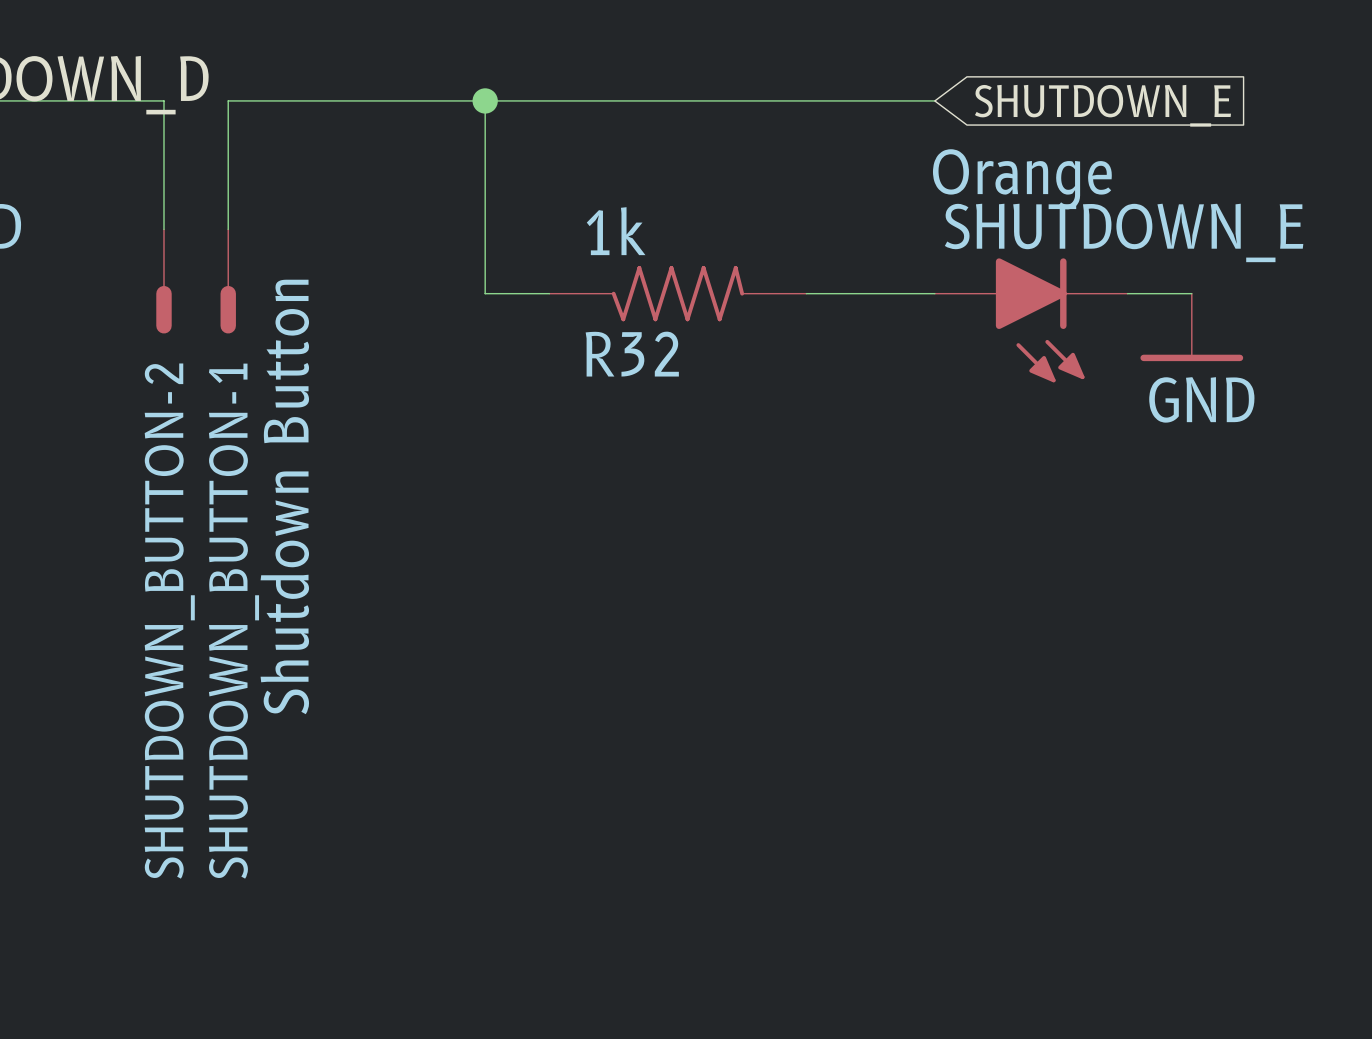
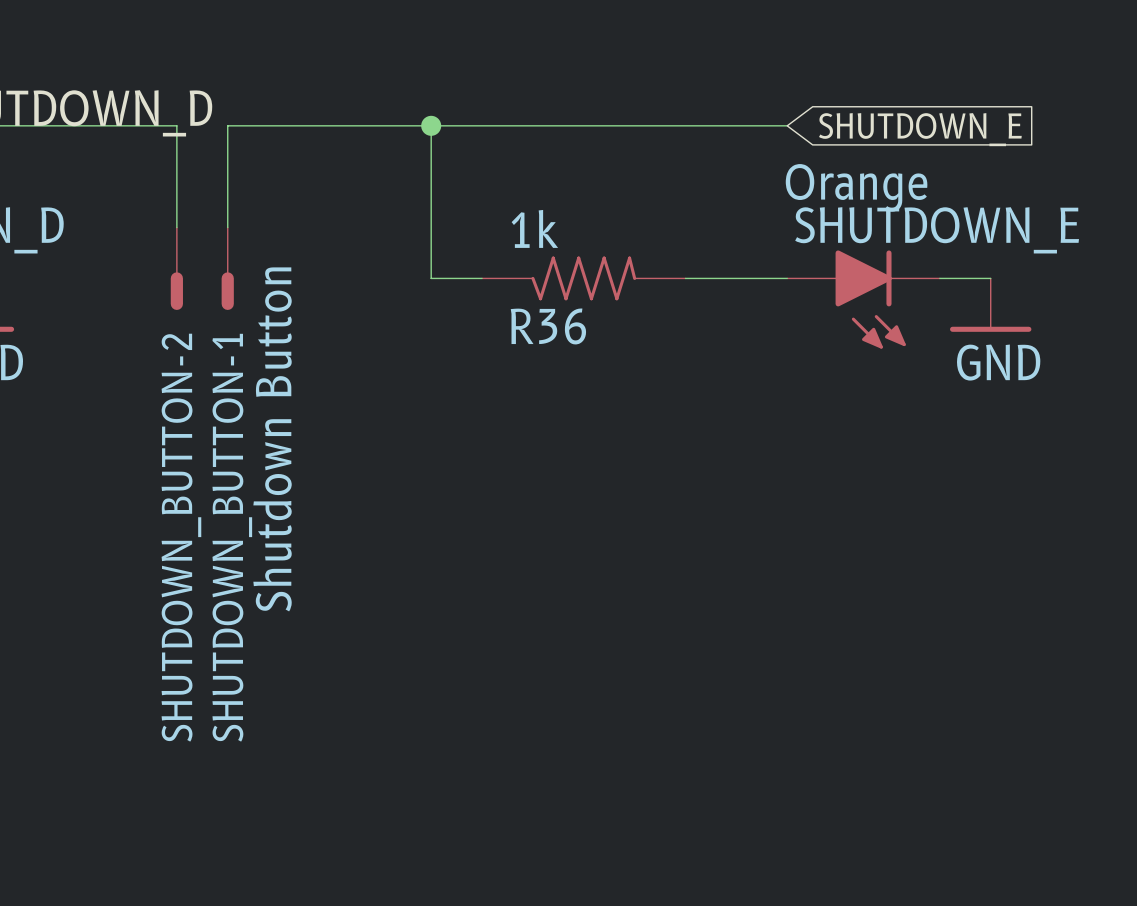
R32 name: R32 (632, 354) -> R36 (548, 326)

